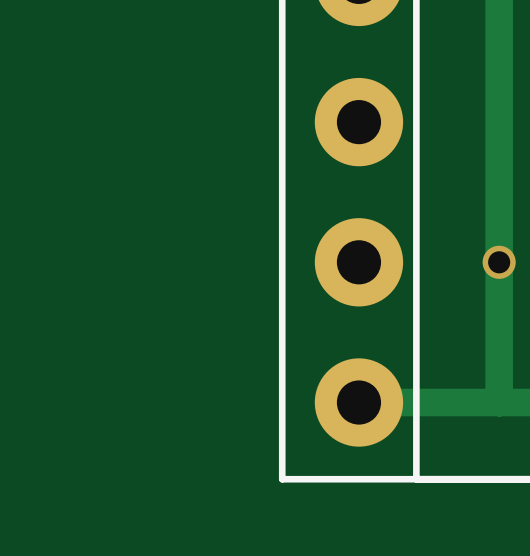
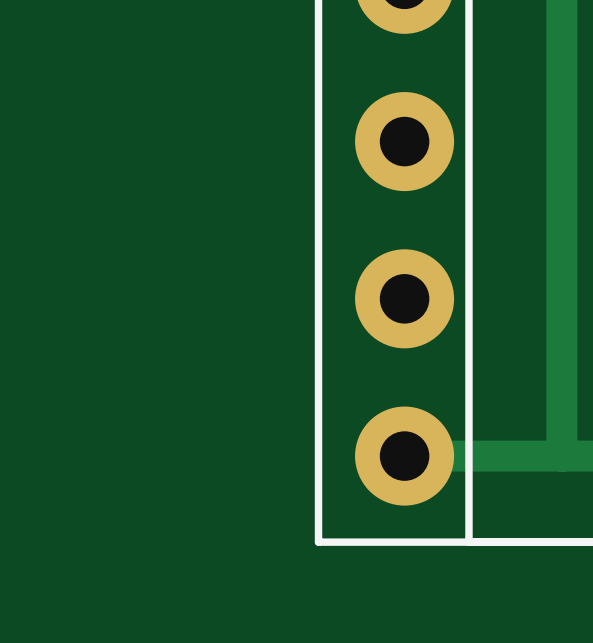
via: (499, 262) -> none

